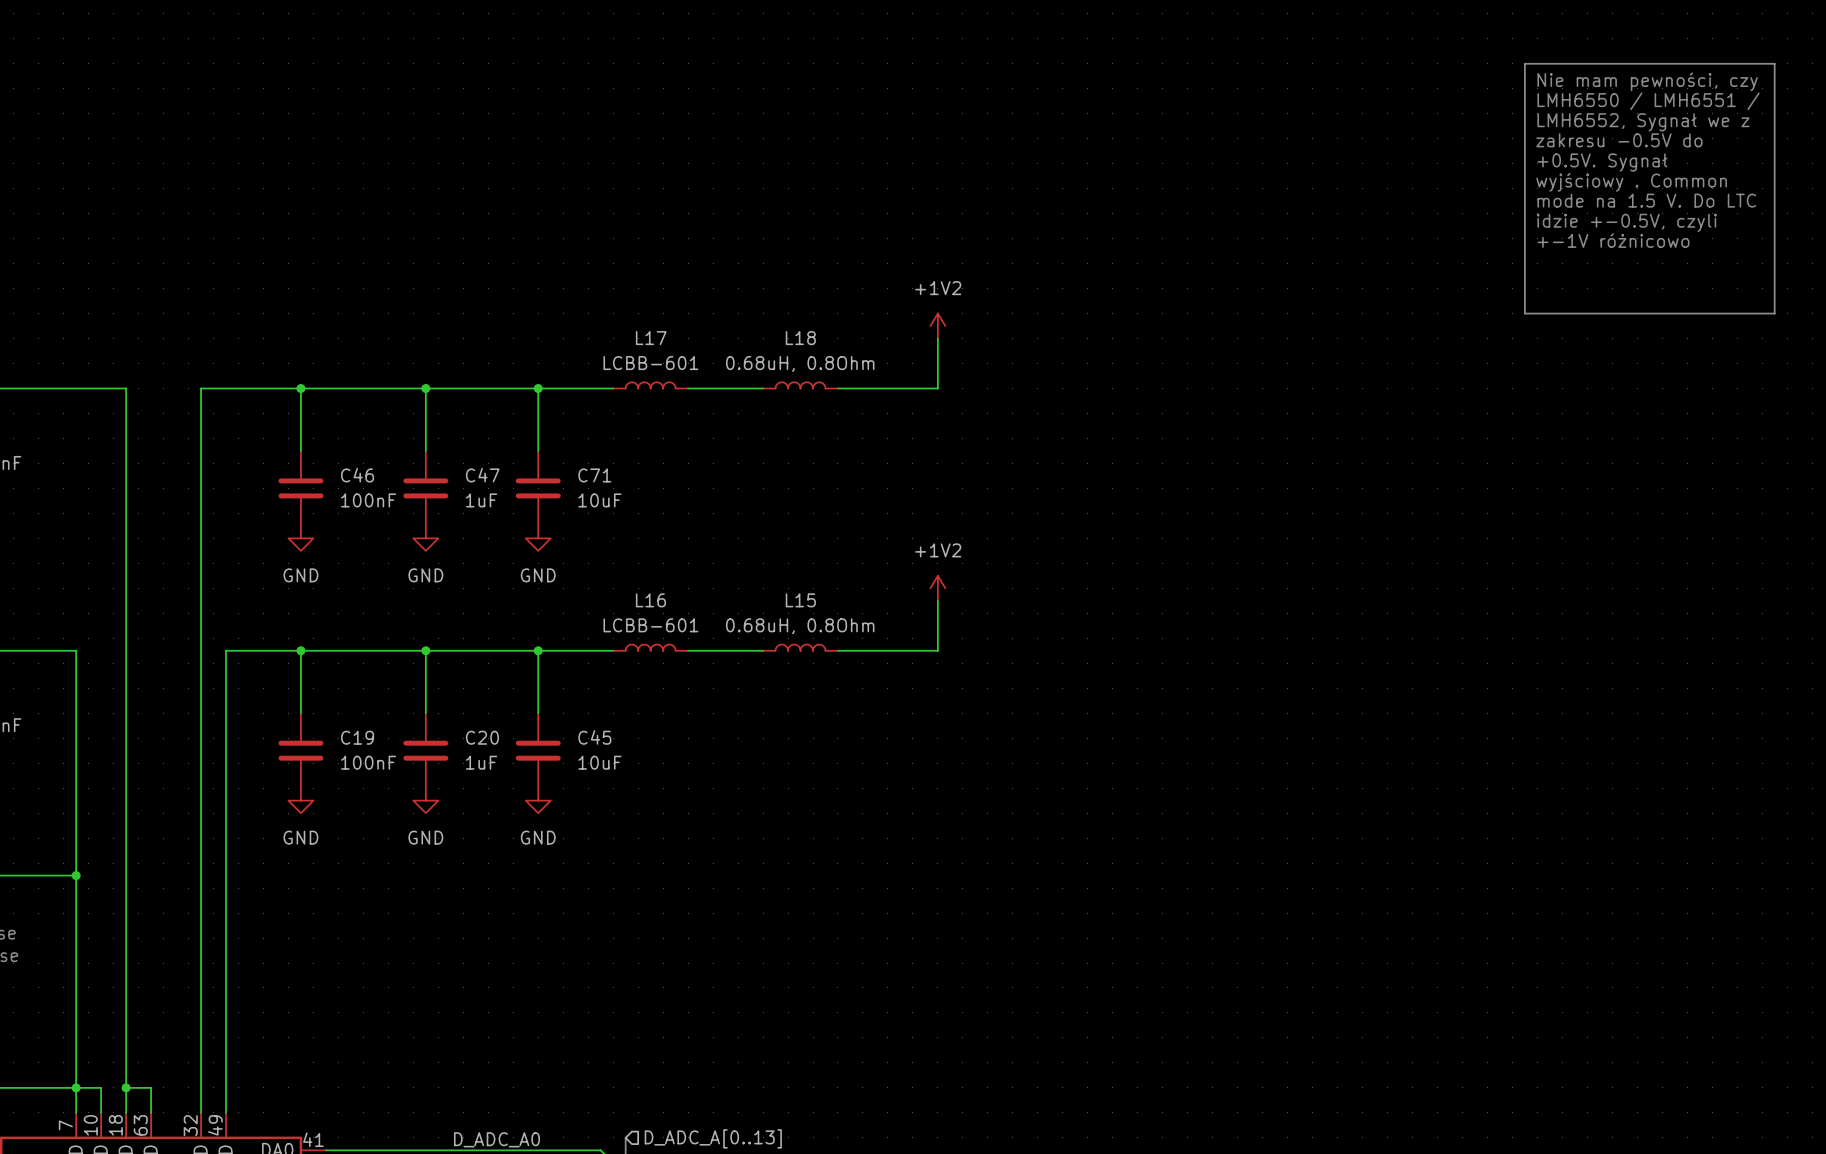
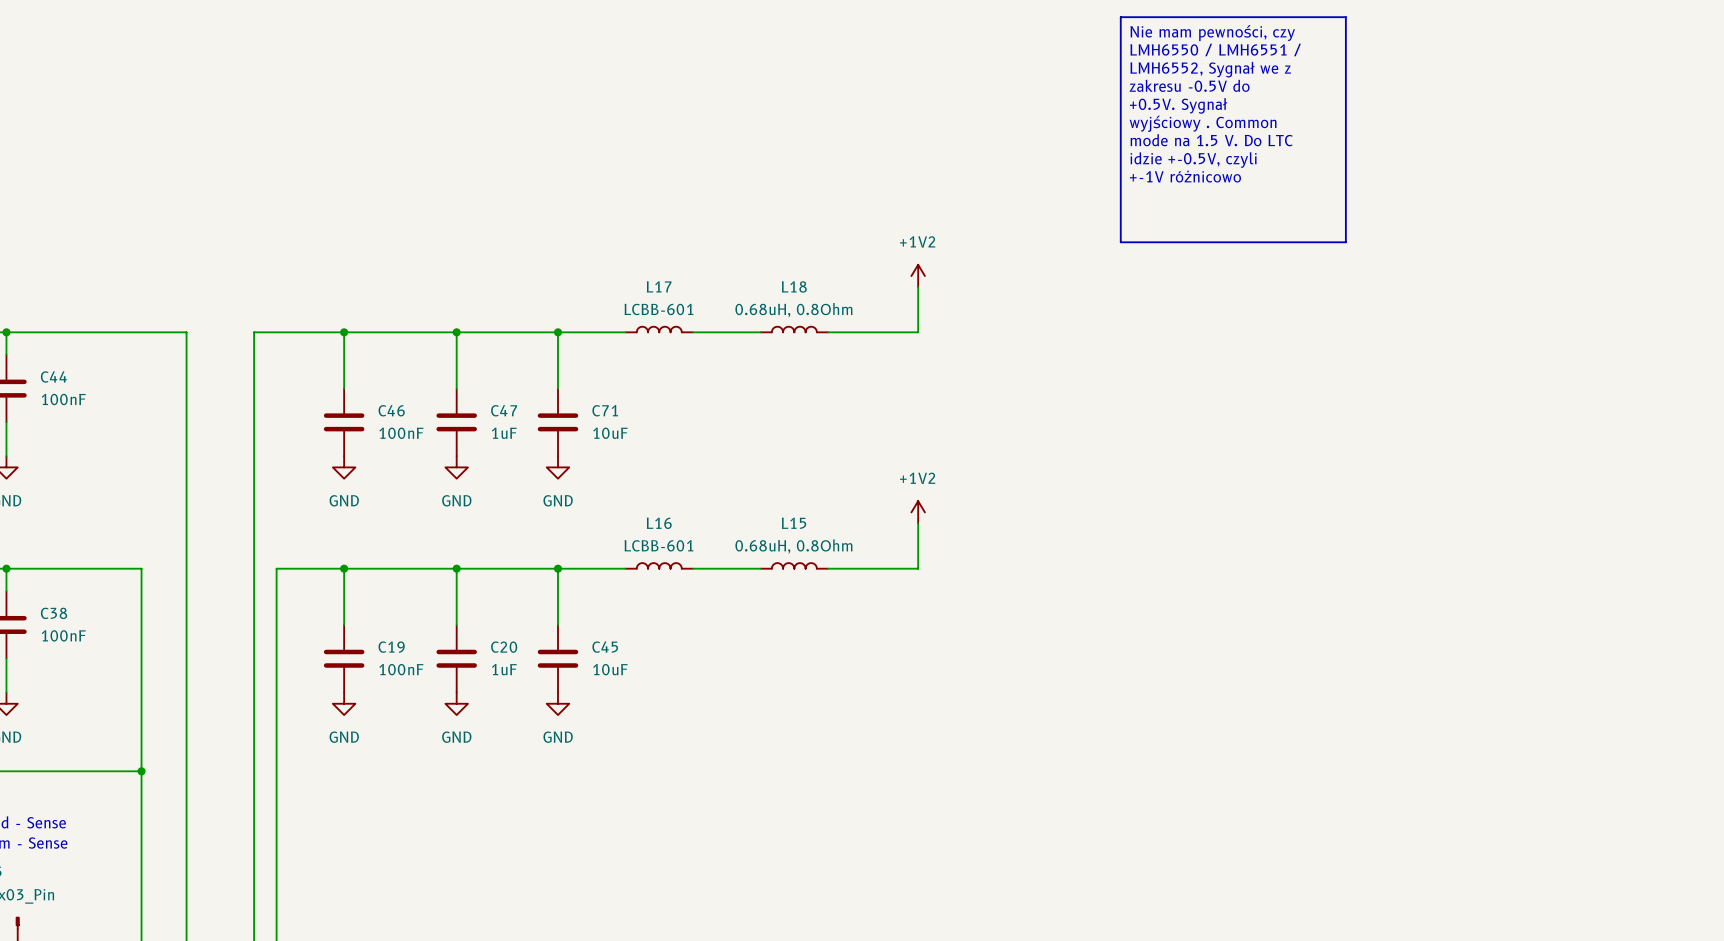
line: none -> (1120, 17) (1345, 17) (1345, 242) (1120, 242) (1120, 17)
text: none -> Nie mam pewności, czy (1212, 33)
line: (1524, 63) (1774, 63) (1774, 313) (1524, 313) (1524, 63) -> none
text: none -> LMH6550 / LMH6551 / (1215, 49)
text: Nie mam pewności, czy (1647, 81) -> none
text: none -> LMH6552, Sygnał we z (1210, 69)
text: LMH6550 / LMH6551 / (1648, 101) -> none
text: none -> zakresu -0.5V do (1189, 85)
text: LMH6552, Sygnał we z (1643, 122) -> none
text: none -> +0.5V. Sygnał (1178, 105)
text: zakresu -0.5V do (1619, 140) -> none
text: none -> wyjściowy . Common (1203, 123)
text: +0.5V. Sygnał (1602, 162) -> none
text: none -> mode na 1.5 V. Do LTC (1211, 140)
text: wyjściowy . Common (1631, 182) -> none
text: none -> idzie +-0.5V, czyli (1193, 160)
text: mode na 1.5 V. Do LTC (1646, 200) -> none
text: none -> +-1V różnicowo (1185, 176)
text: idzie +-0.5V, czyli (1626, 222) -> none
text: +-1V różnicowo (1613, 240) -> none

